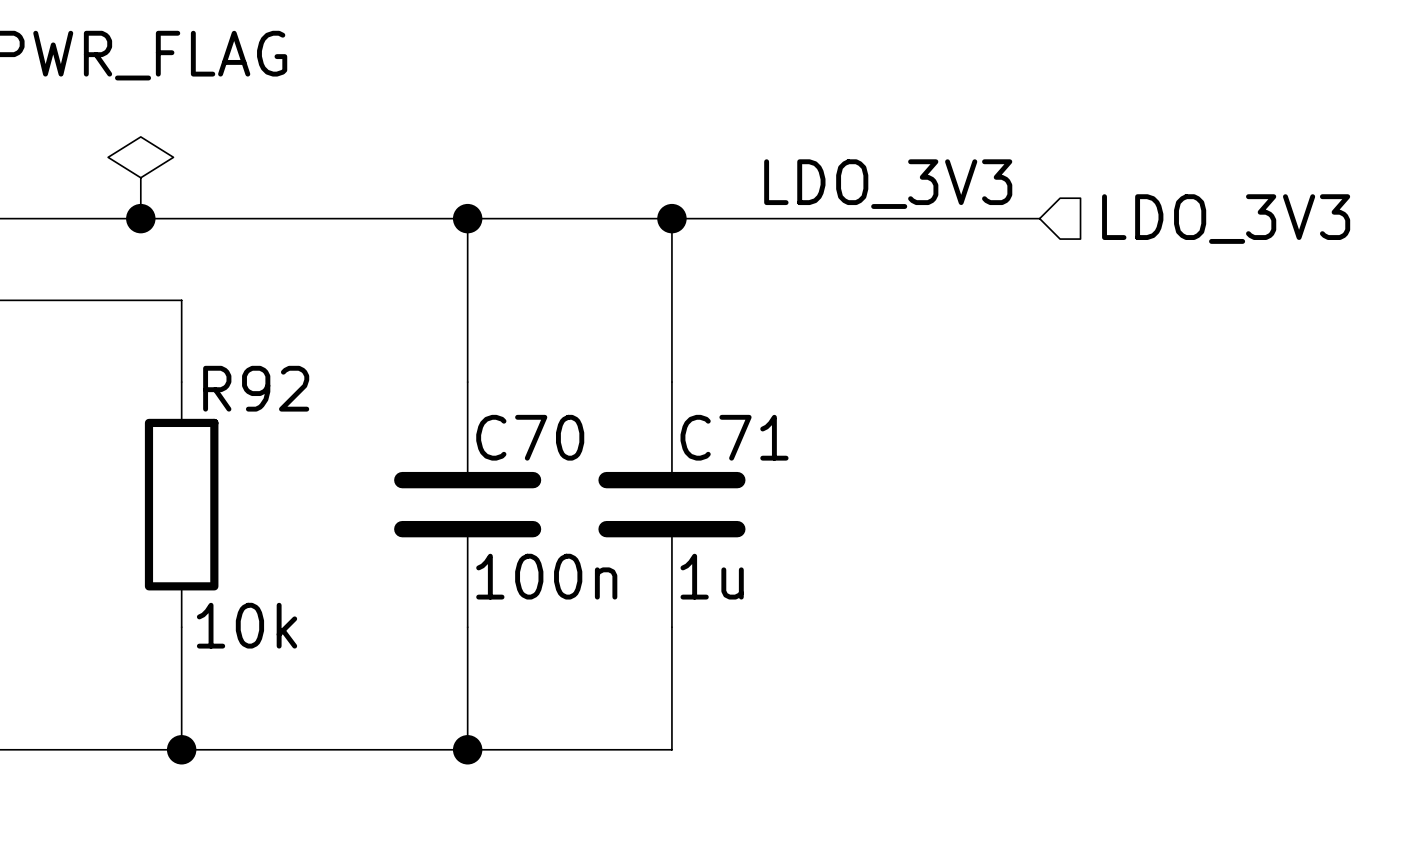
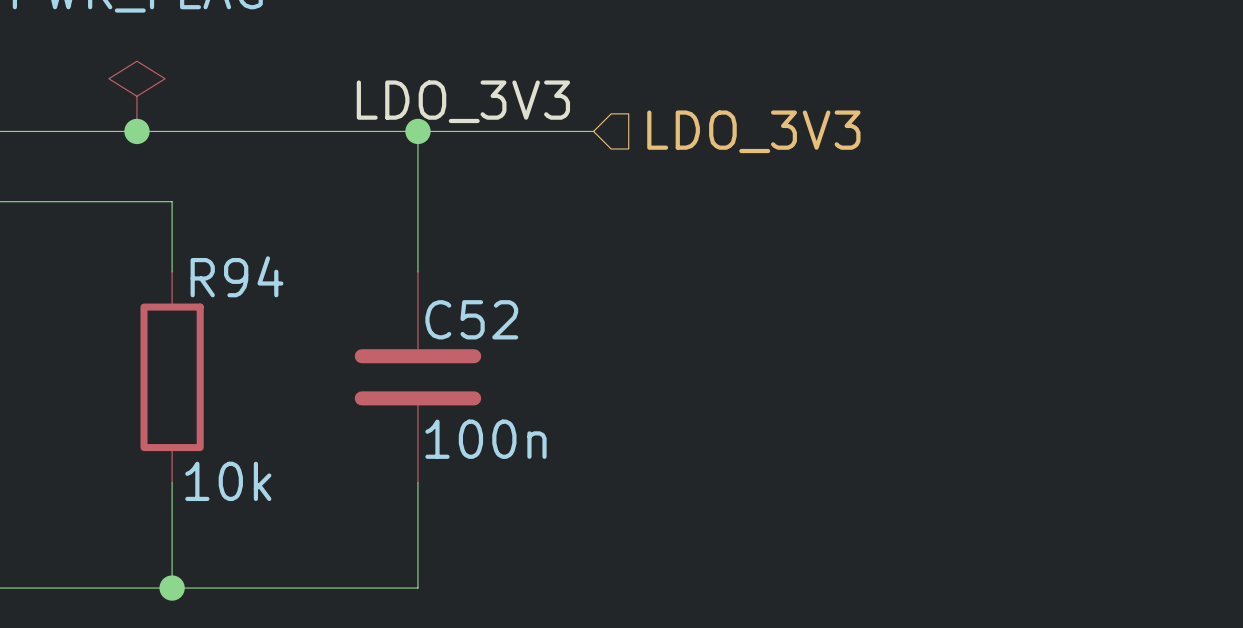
label position: LDO_3V3 (888, 184) -> LDO_3V3 (463, 101)
junction: (671, 218) -> none
wire: (1039, 218) (671, 218) (671, 382) -> none
hierarchical label position: LDO_3V3 (1226, 219) -> LDO_3V3 (753, 131)
R92 name: R92 (256, 388) -> R94 (237, 276)
C70 name: C70 (530, 437) -> C52 (471, 319)
C71: 1u (671, 504) -> none
wire: (671, 627) (671, 749) (467, 749) -> none
junction: (467, 749) -> none

